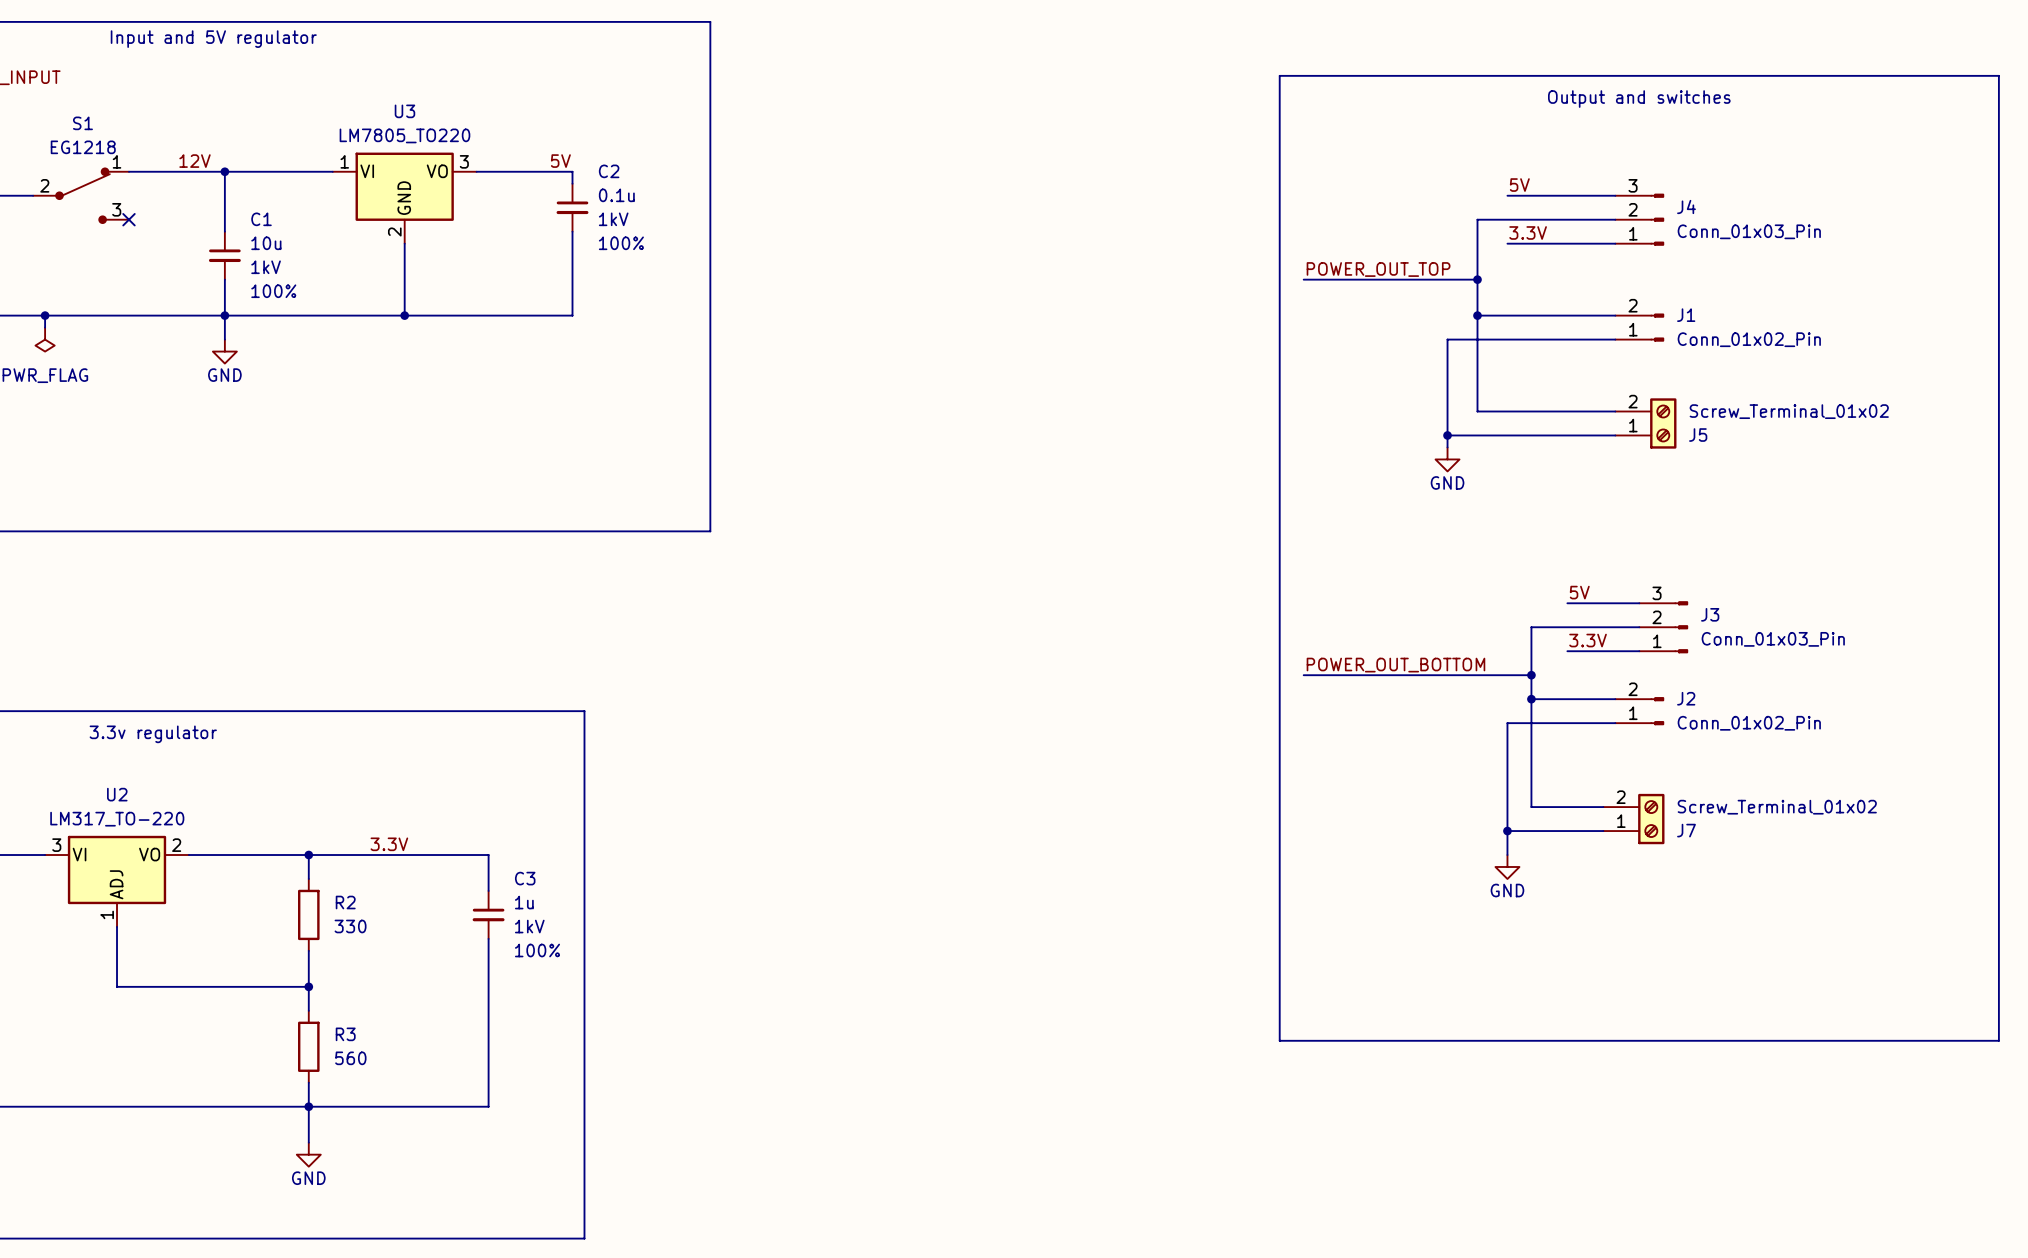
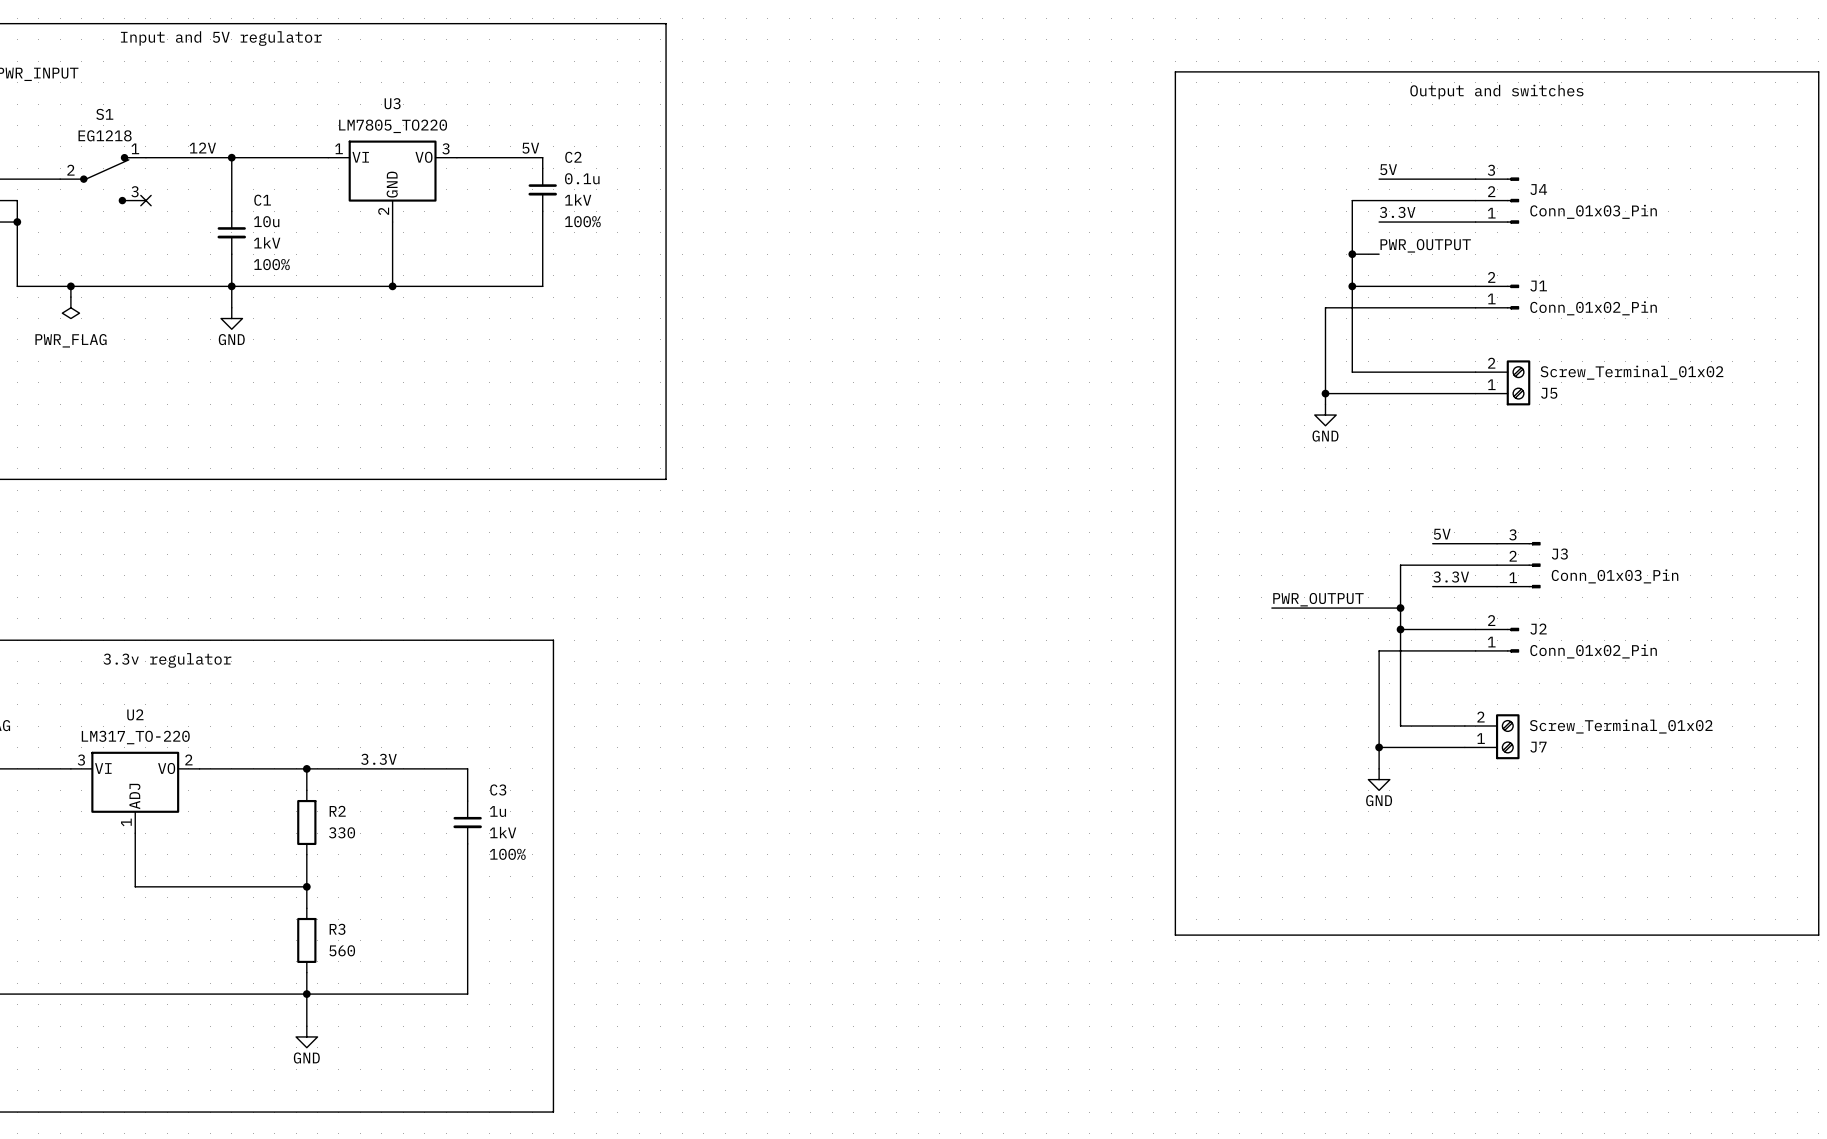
label: POWER_OUT_TOP (1378, 269) -> none
label: none -> PWR_OUTPUT (1425, 245)
wire: (1303, 279) (1477, 279) -> (1379, 254) (1352, 254)
label: POWER_OUT_BOTTOM (1395, 665) -> PWR_OUTPUT (1318, 599)
wire: (1303, 675) (1387, 675) -> none

